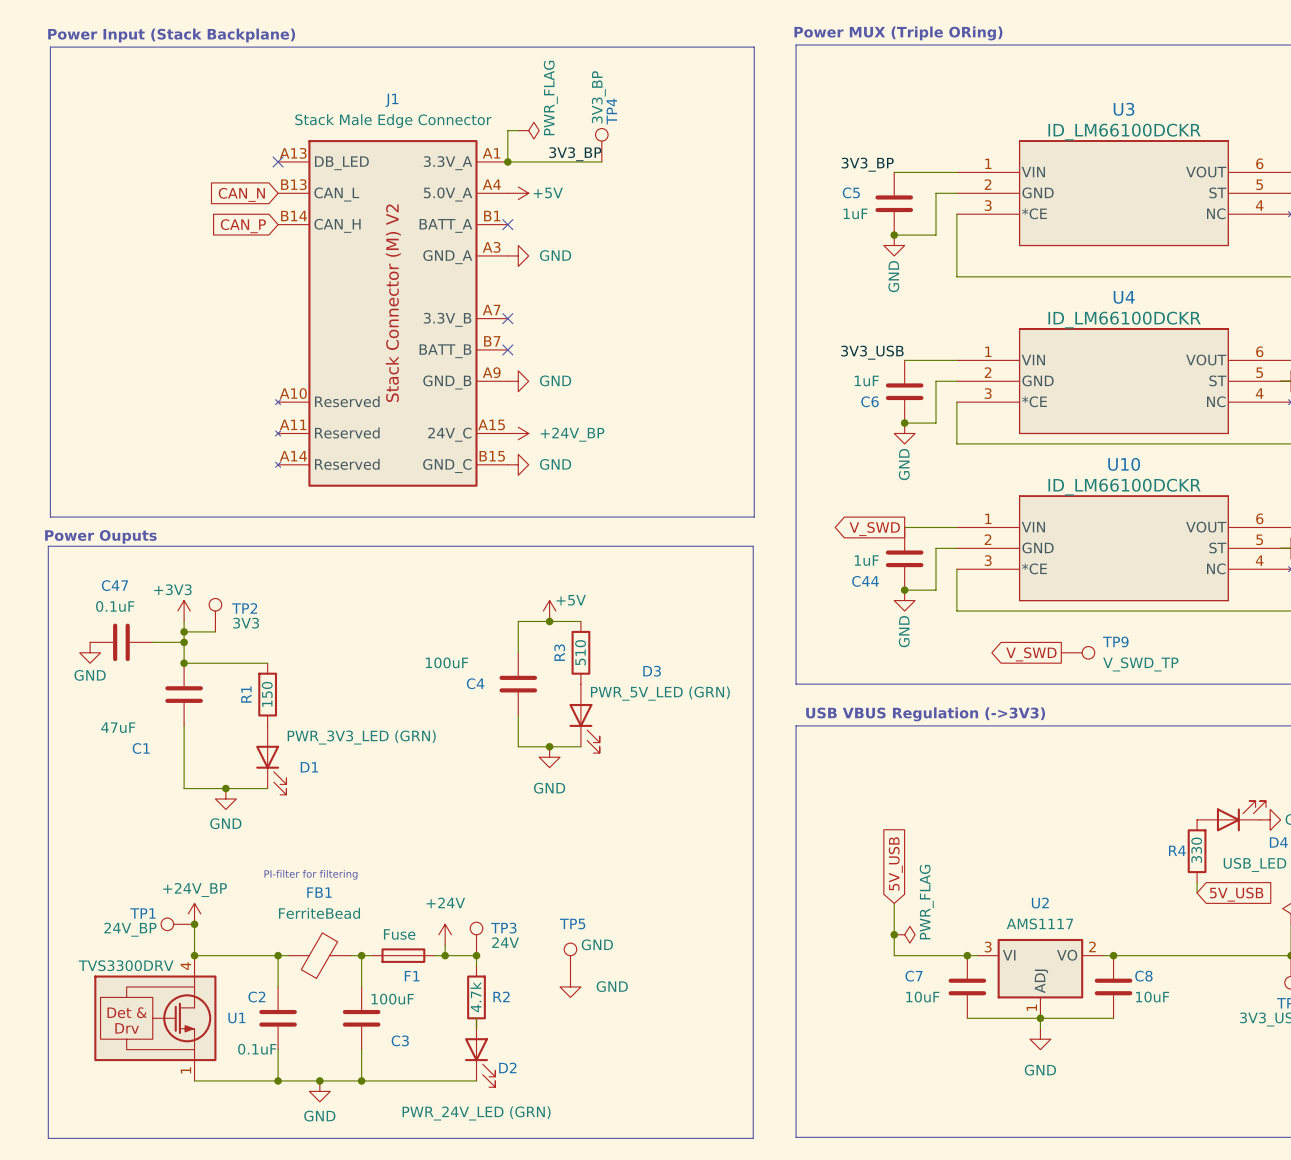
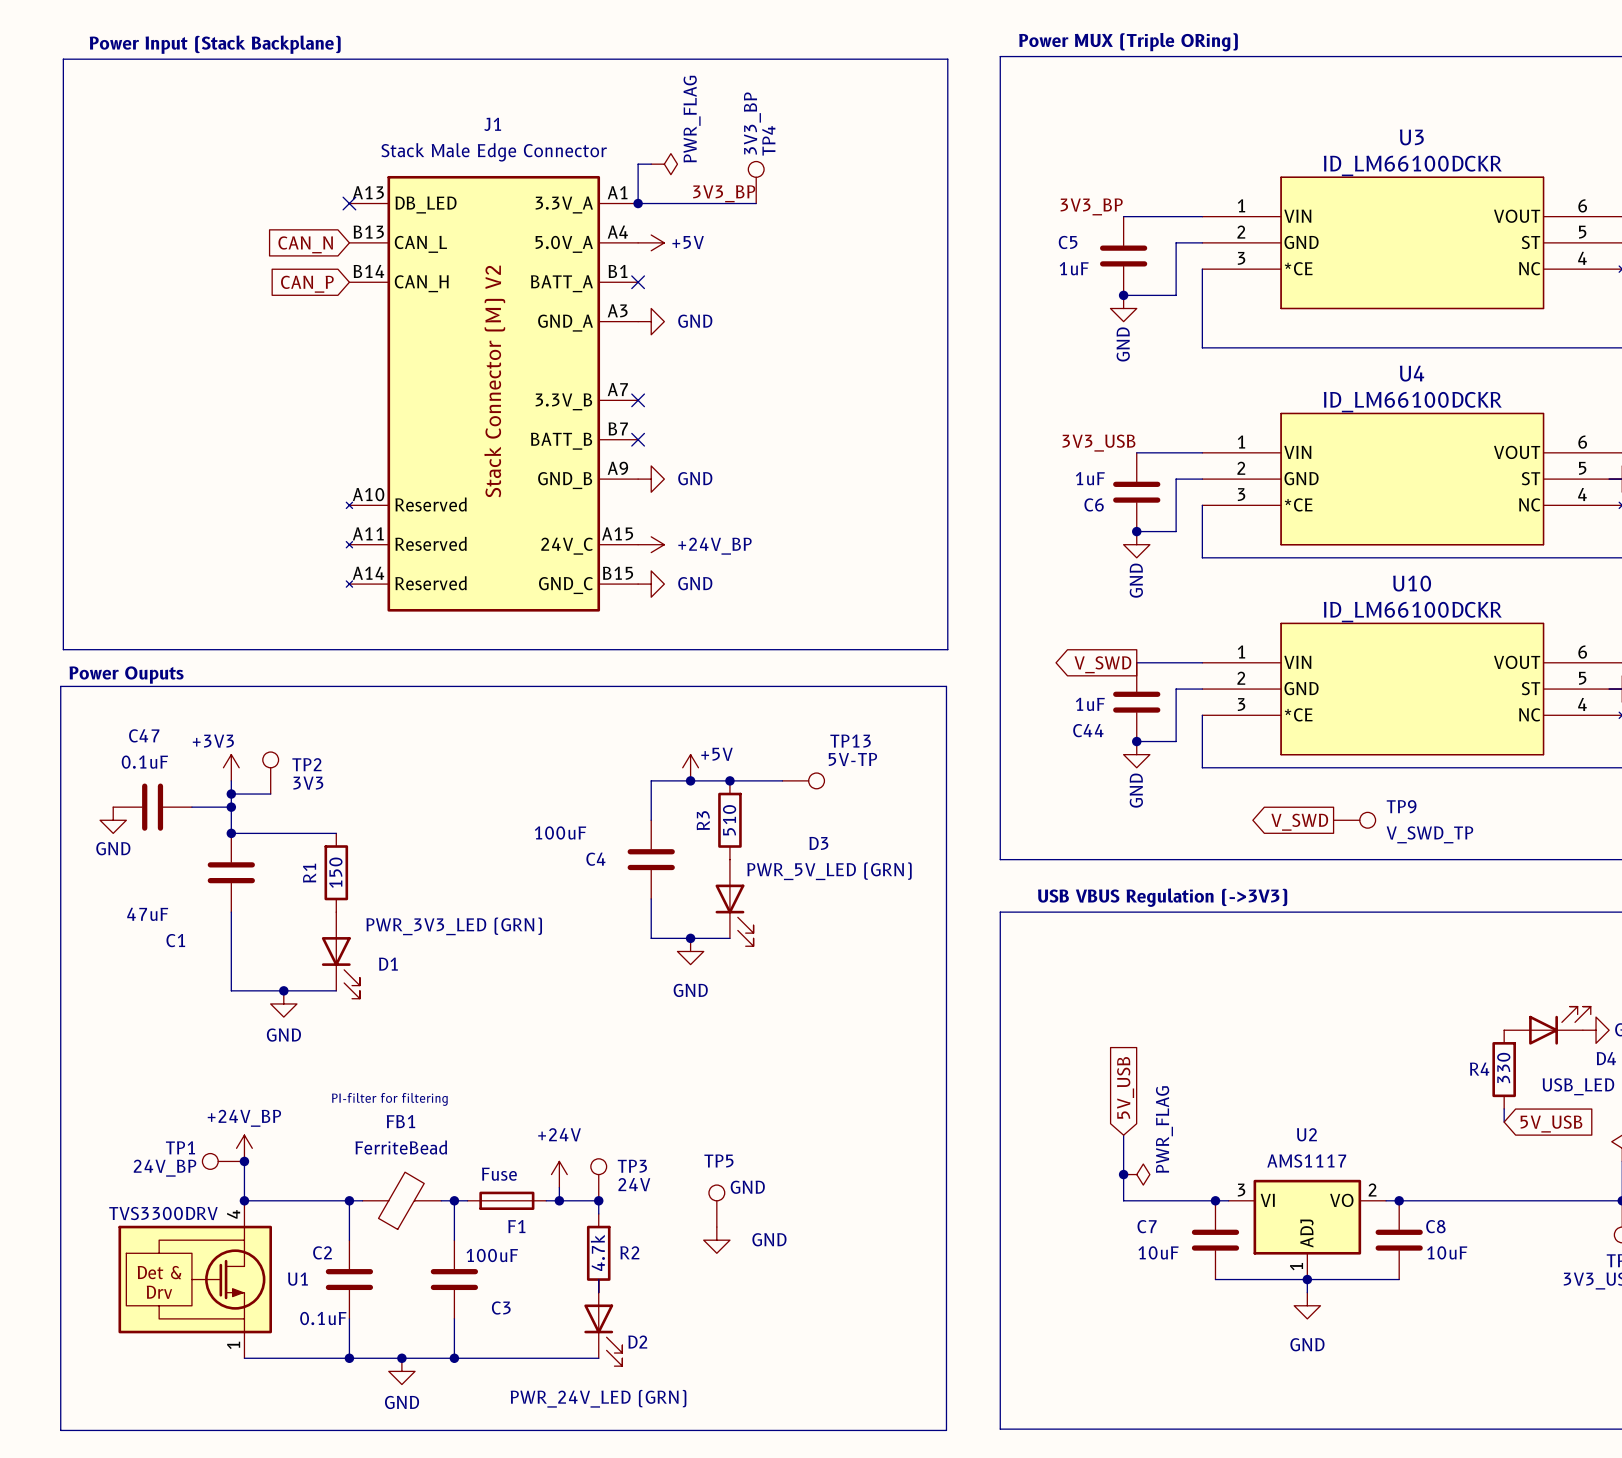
wire: none -> (729, 780) (782, 780)
junction: none -> (729, 780)
TP13: none -> 5V-TP (803, 780)

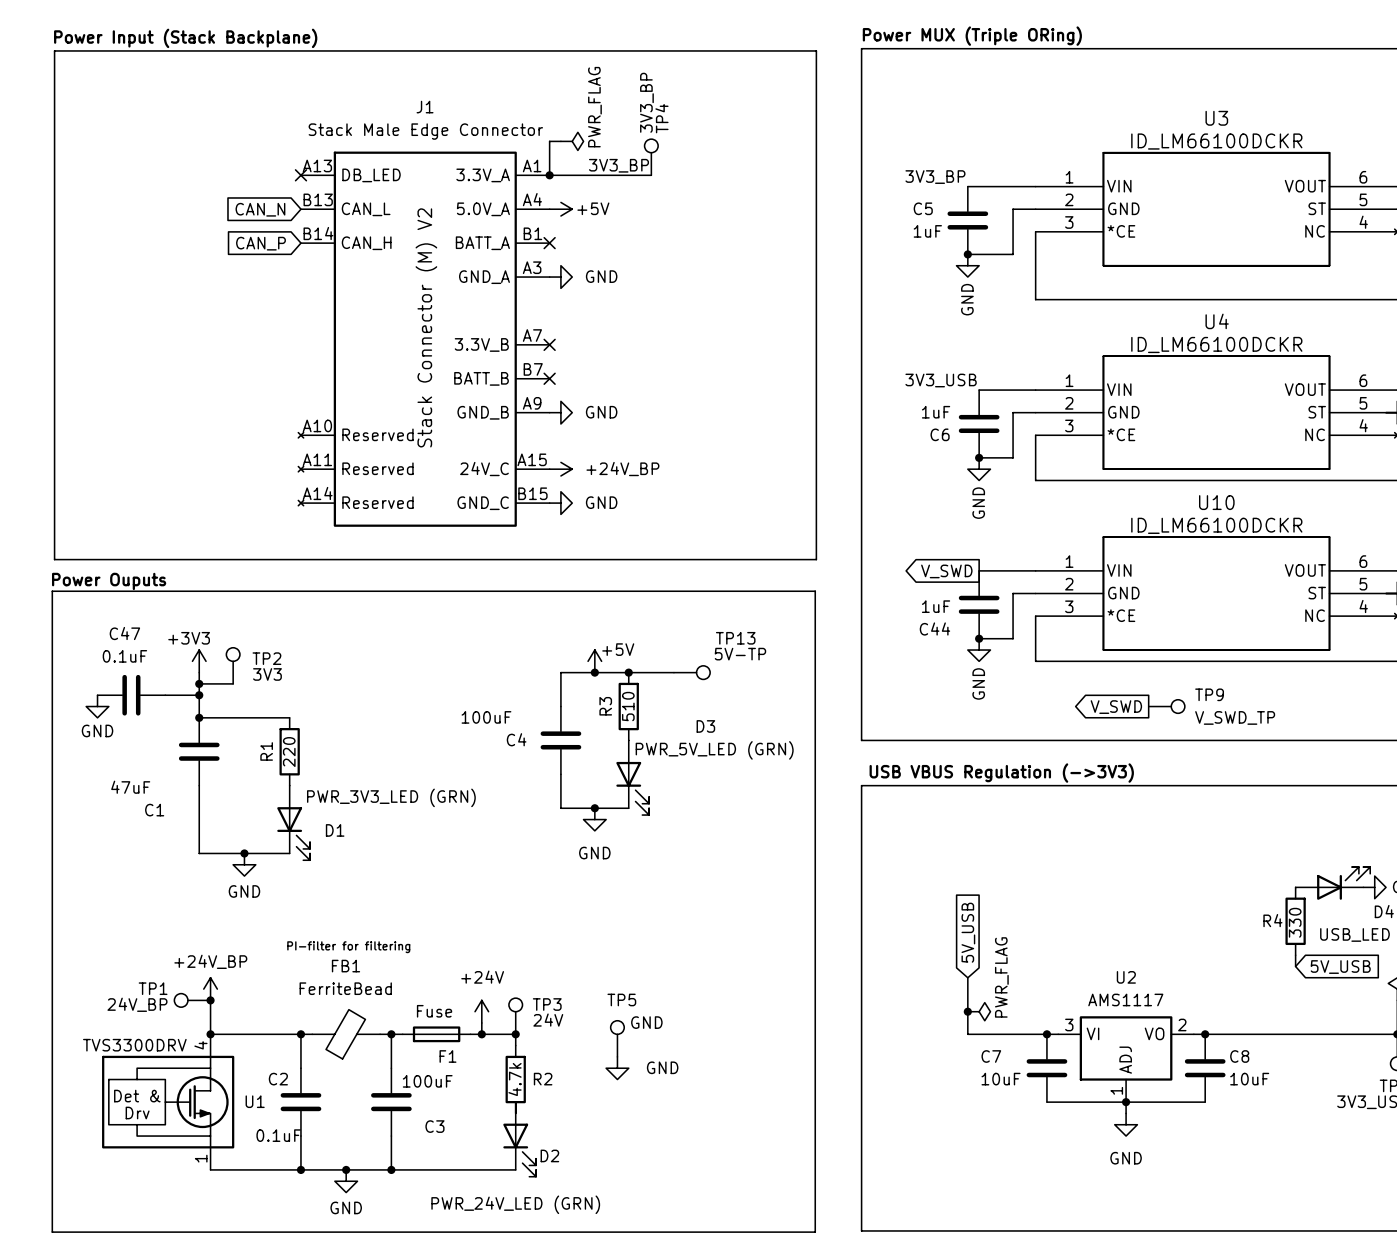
R1 value: 150 (335, 872) -> 220 (289, 752)

